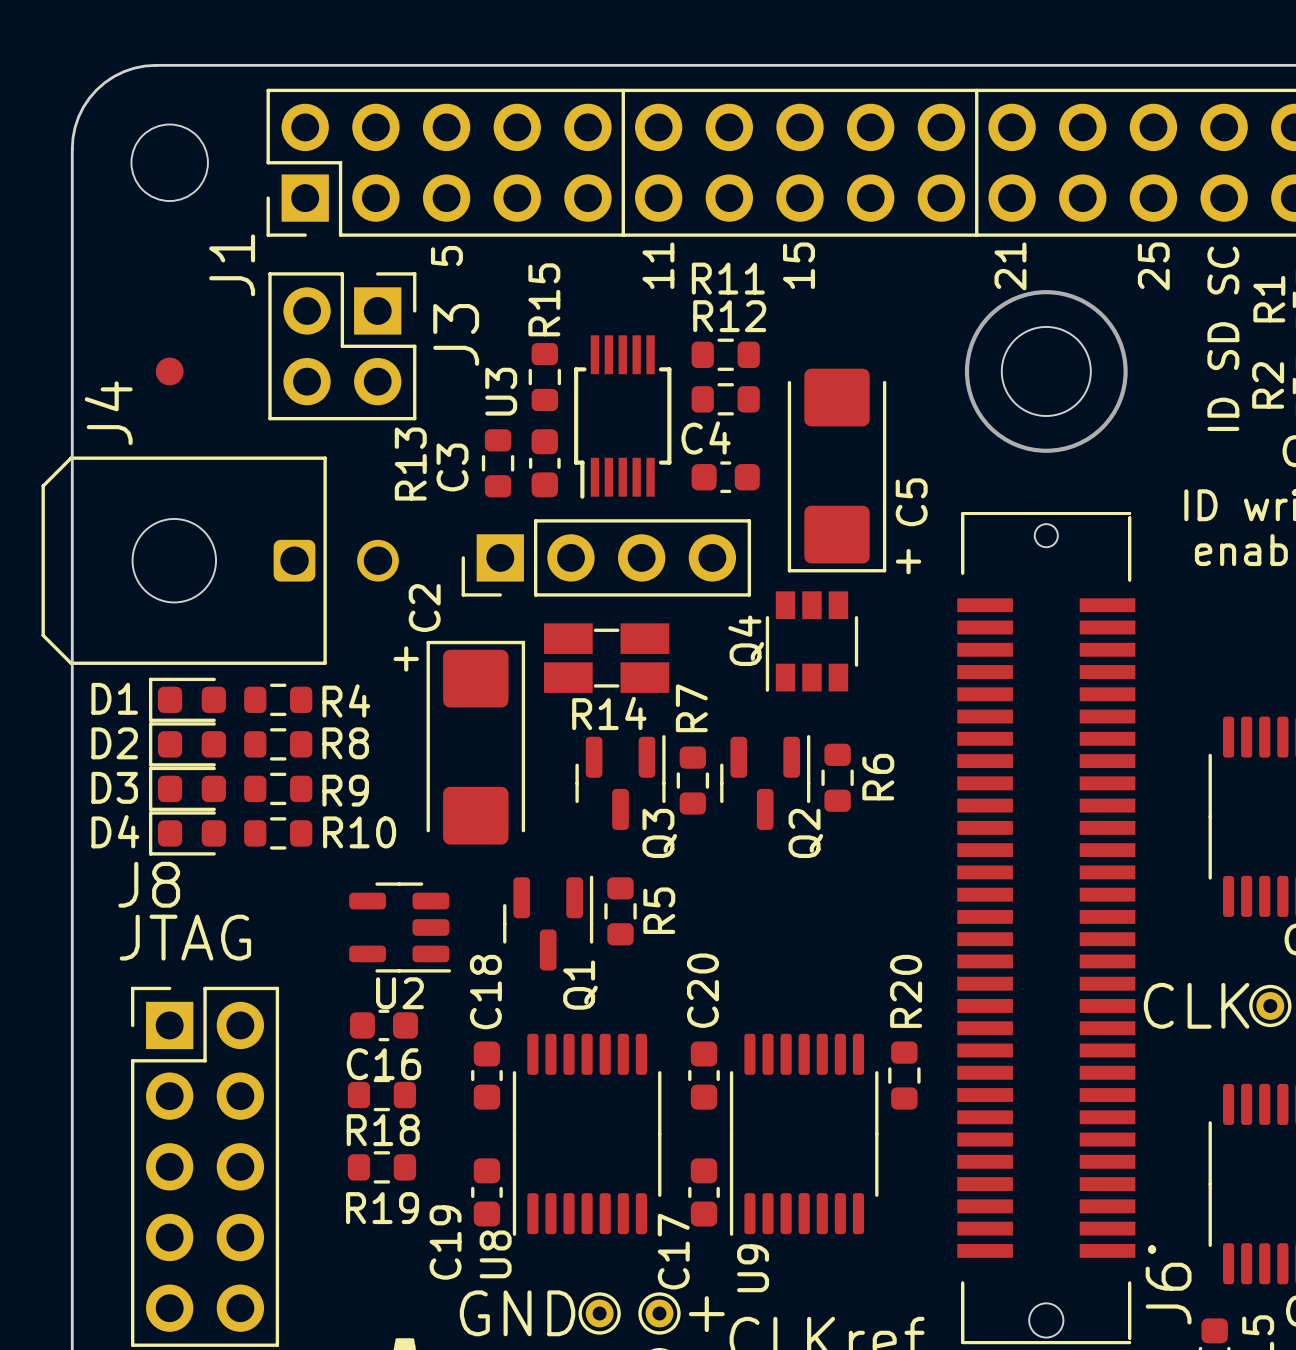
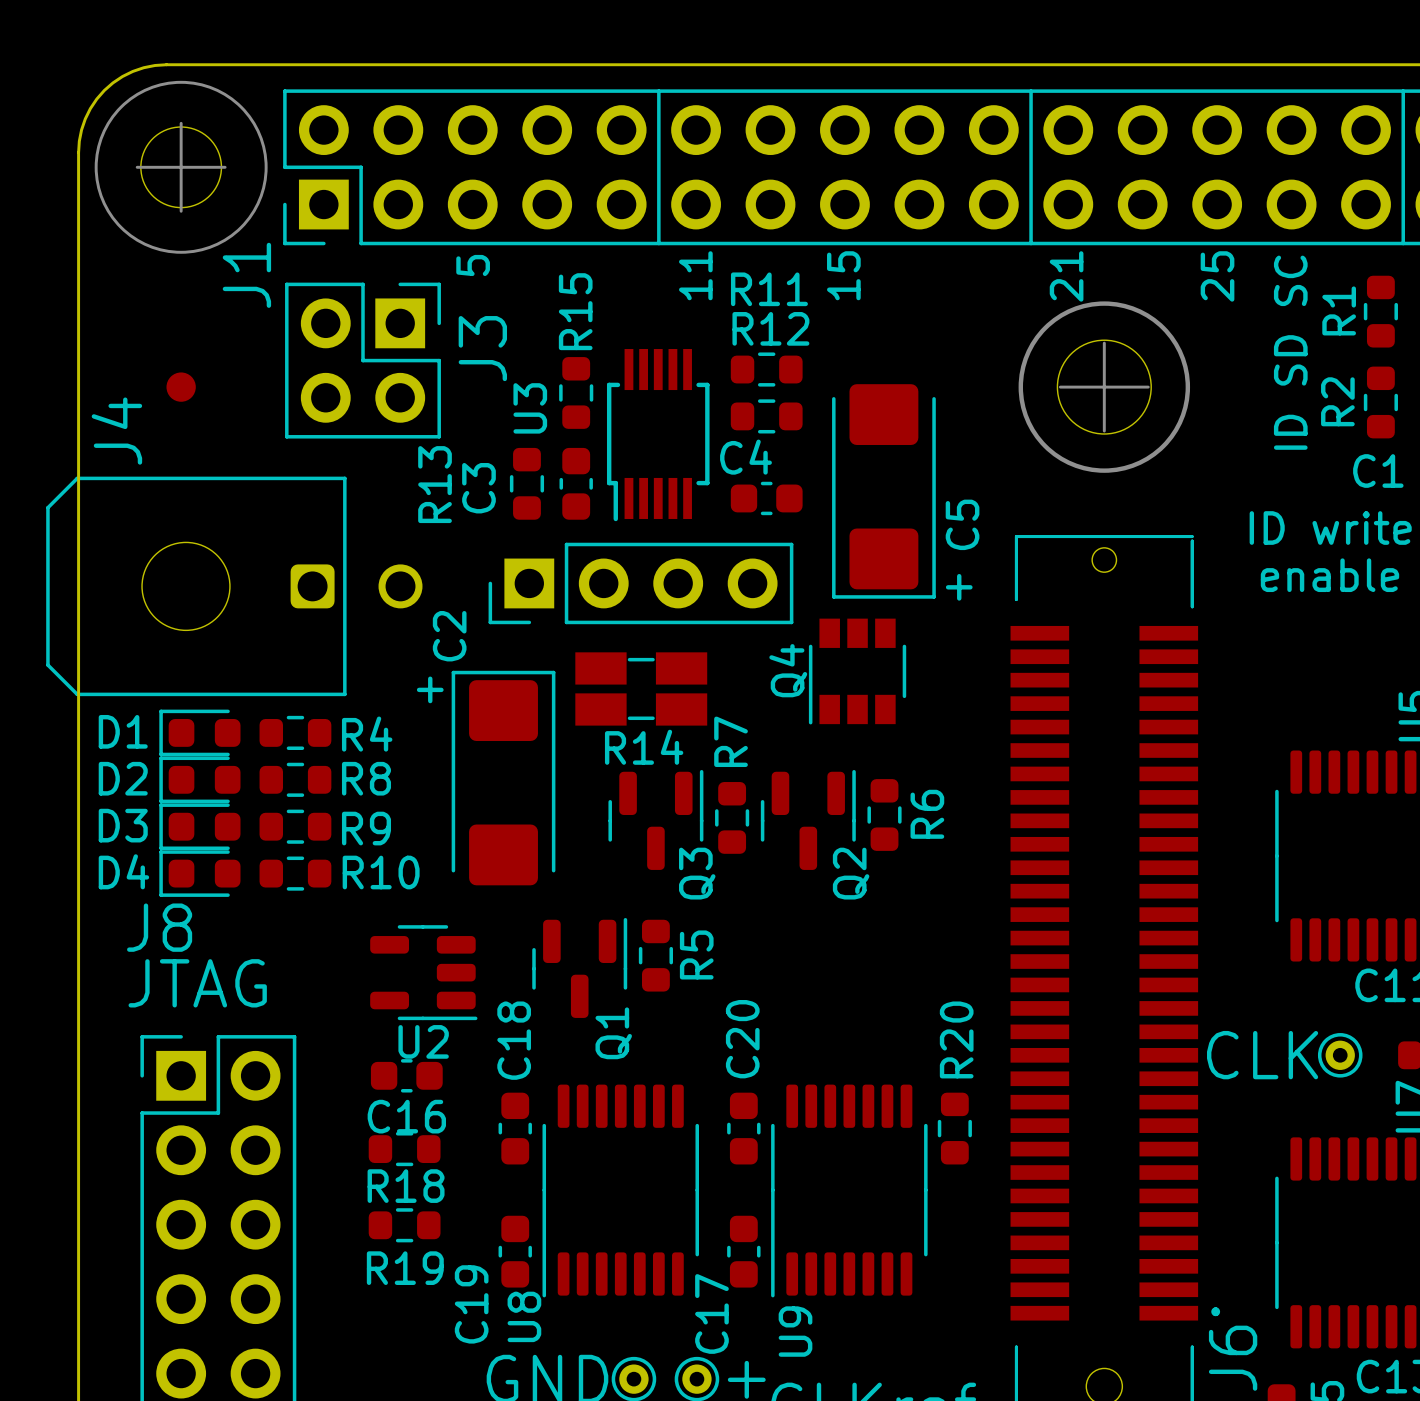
drawing: none -> [94, 80, 268, 254]
line: none -> (181, 123) (181, 211)
line: none -> (137, 167) (225, 167)
line: none -> (1104, 343) (1104, 431)
line: none -> (1060, 387) (1148, 387)

